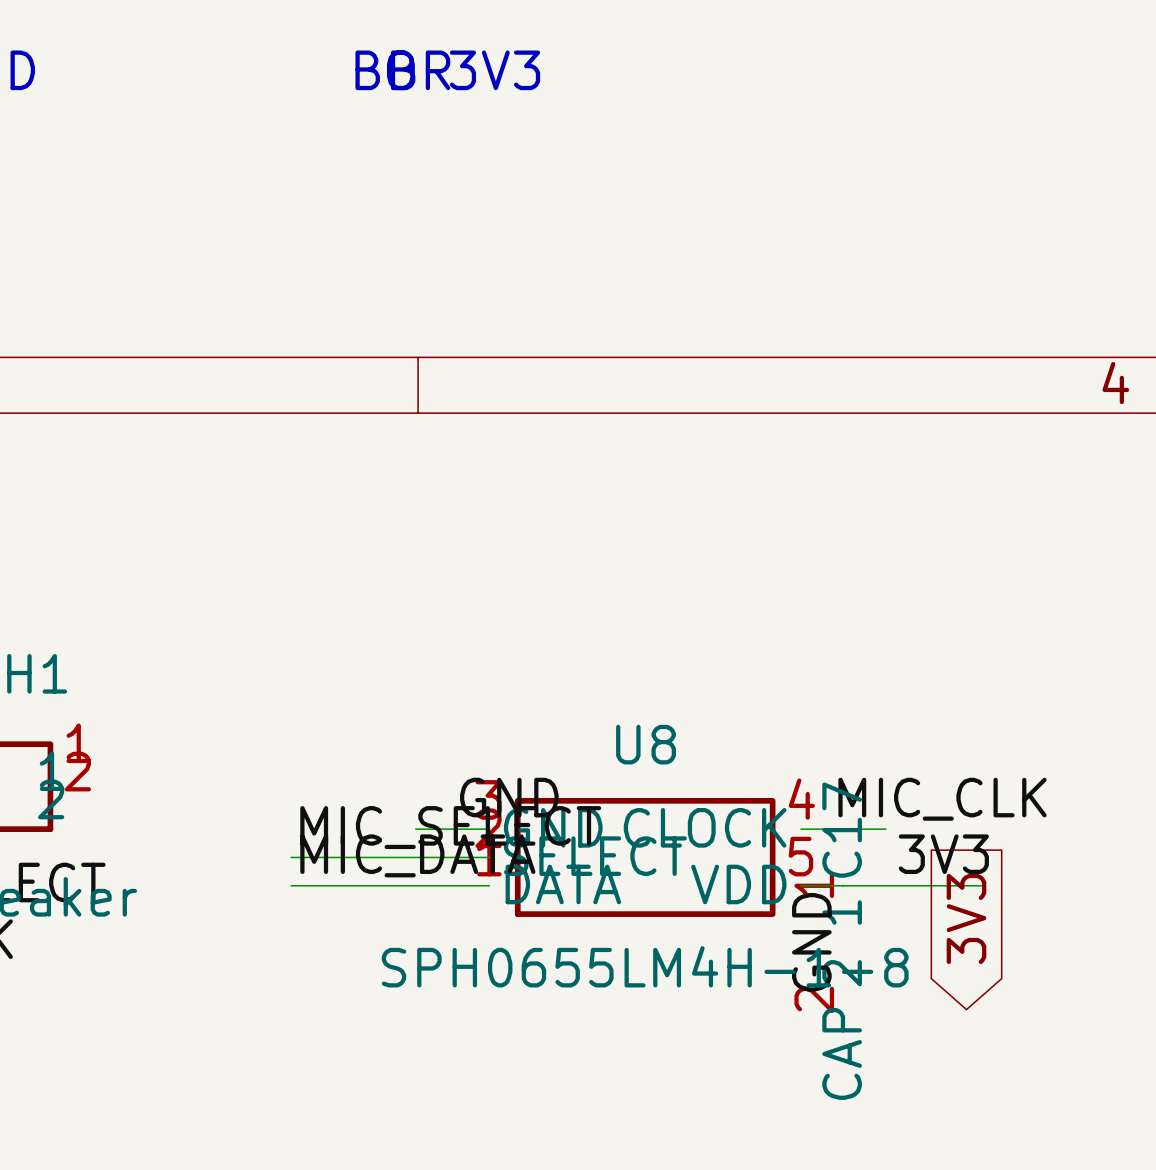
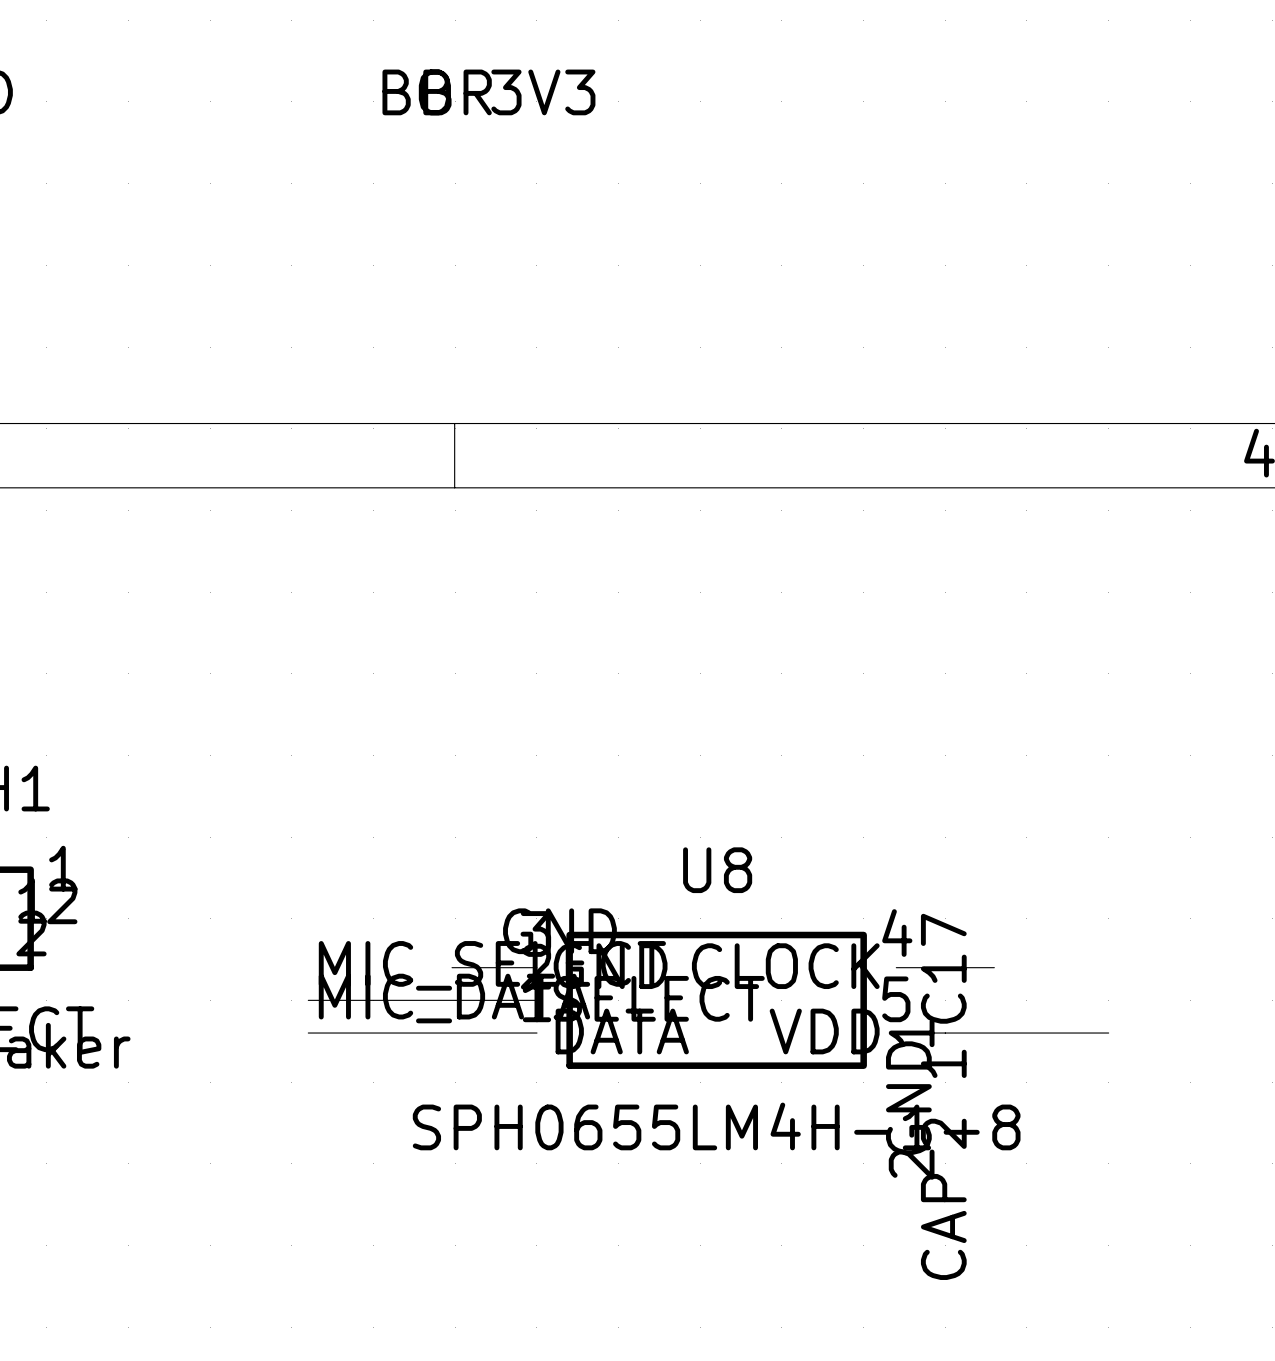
label: MIC_CLK (942, 799) -> none
label: 3V3 (943, 854) -> none
global label: 3V3 (966, 918) -> none

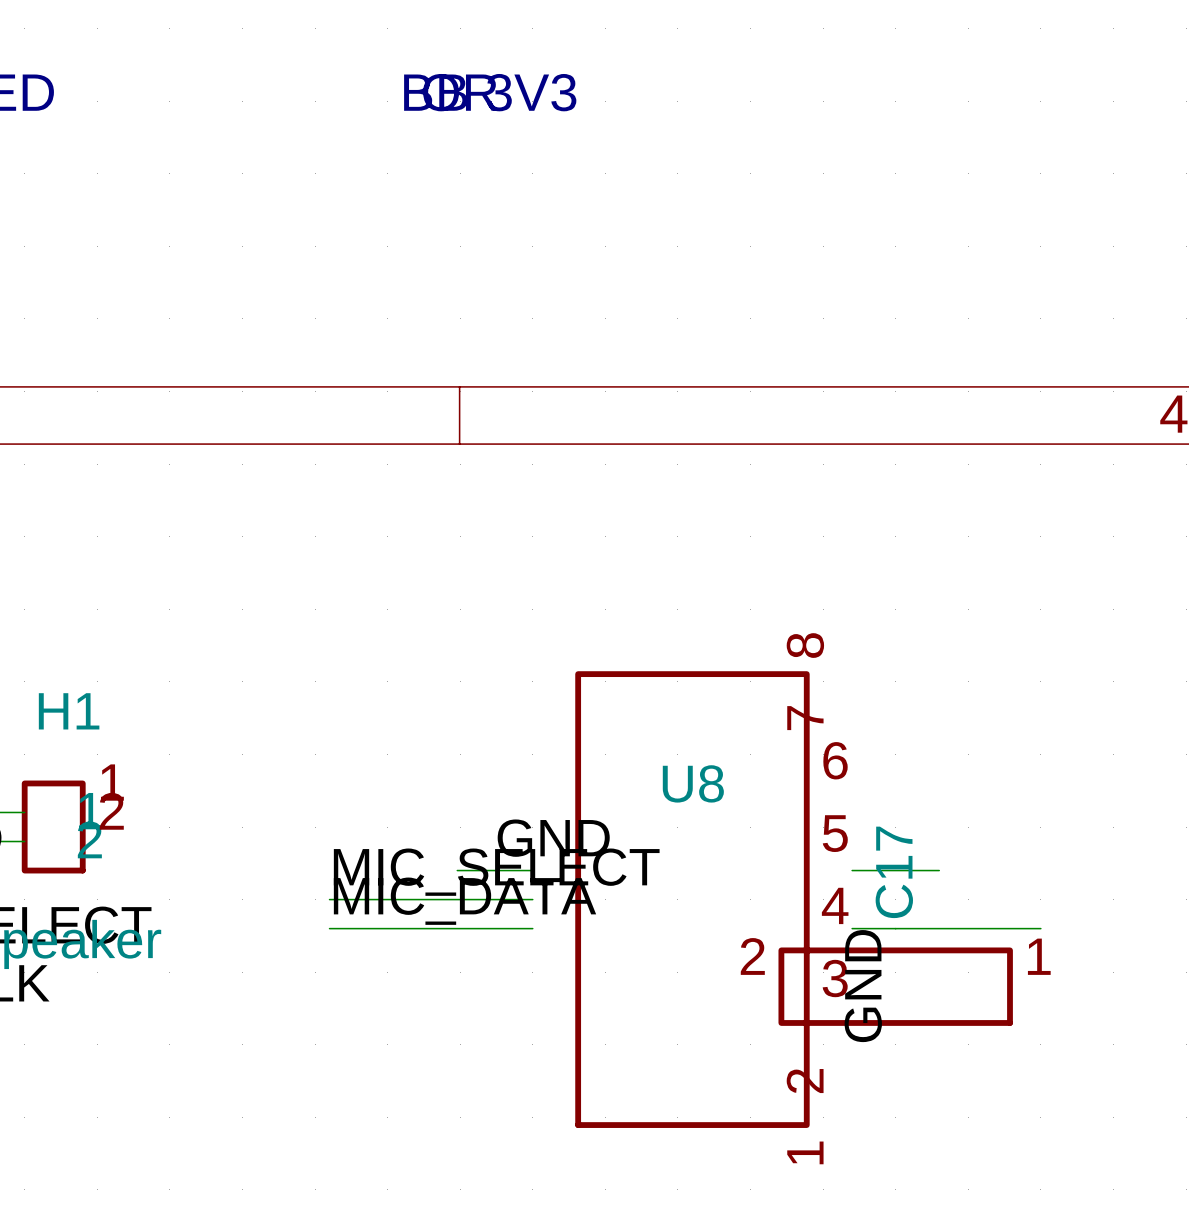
C17 symbol: [888, 913, 967, 1280] -> [778, 947, 1013, 1026]
U8 symbol: [566, 931, 867, 1069] -> [575, 671, 810, 1128]
U8 value: SPH0655LM4H-1-8 (716, 1126) -> none
C17 value: CAP (943, 1226) -> none

